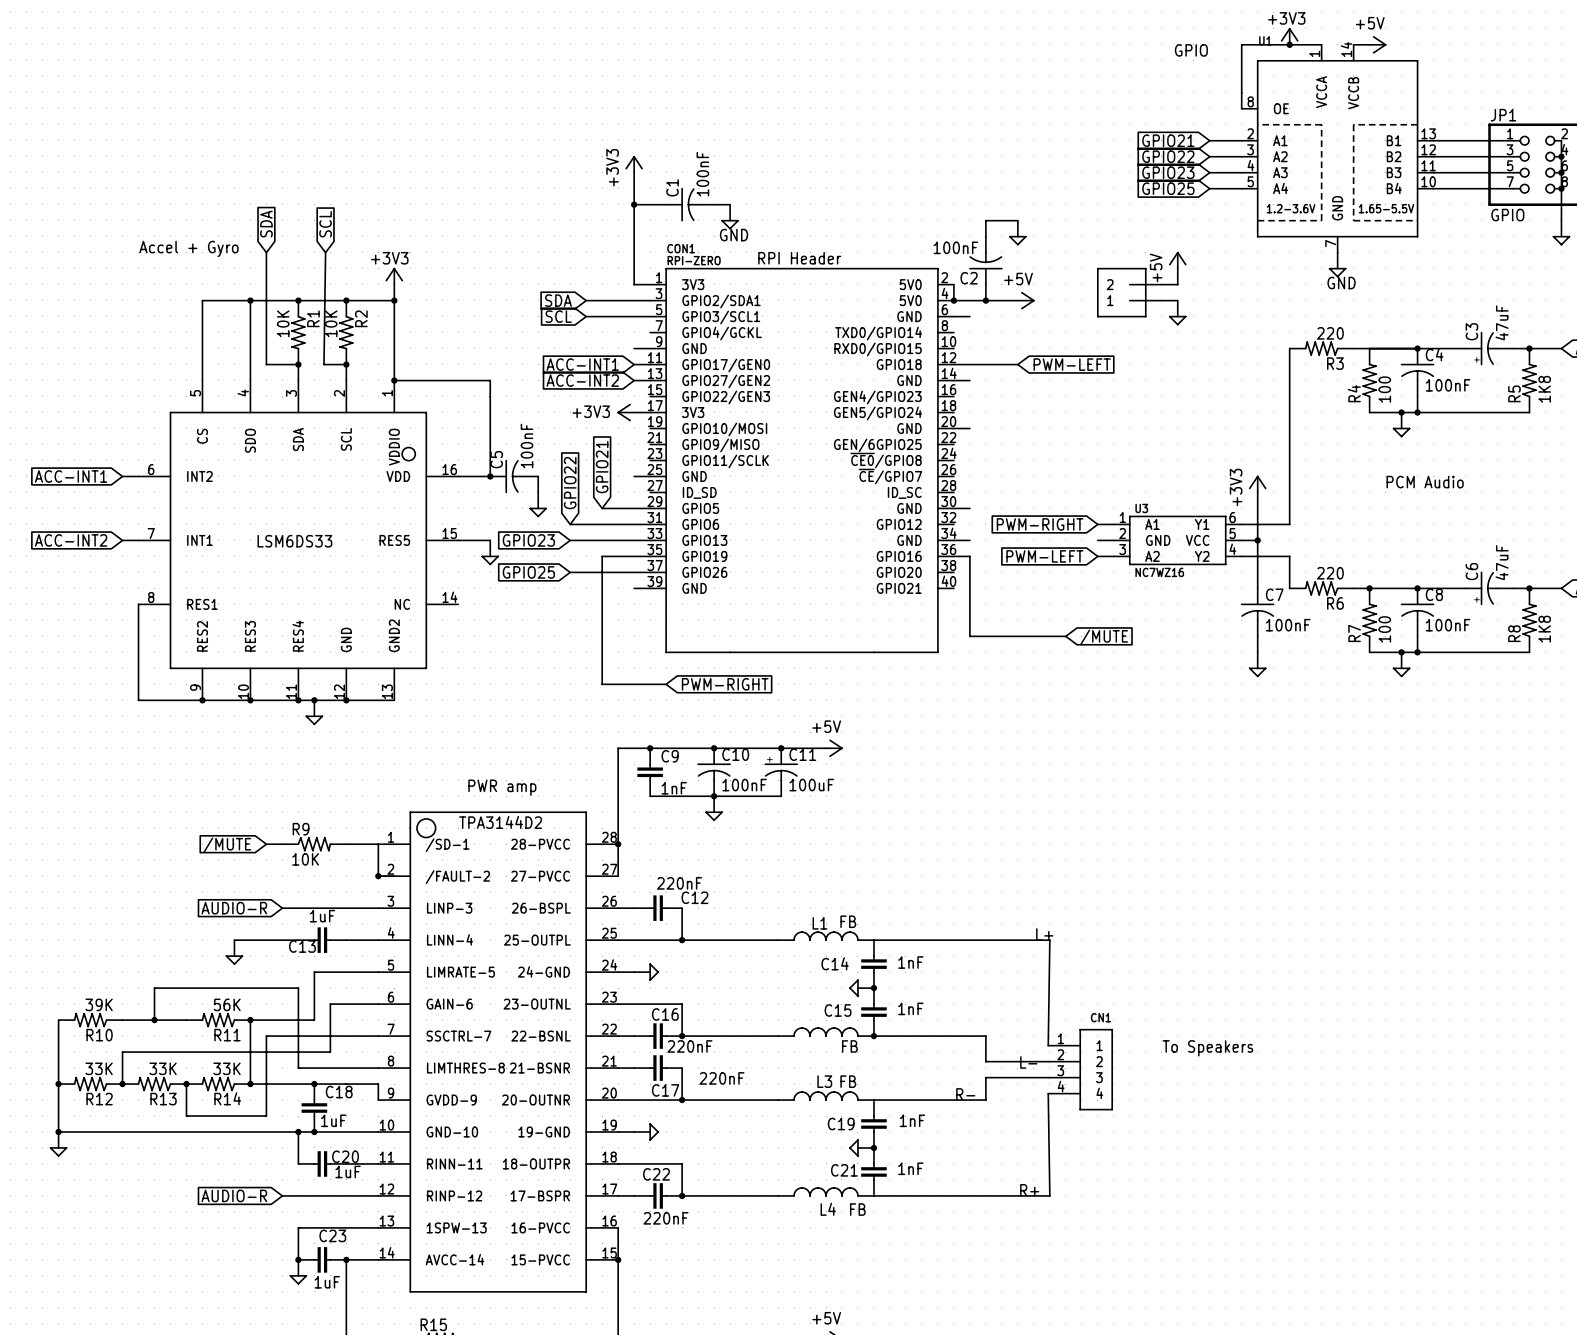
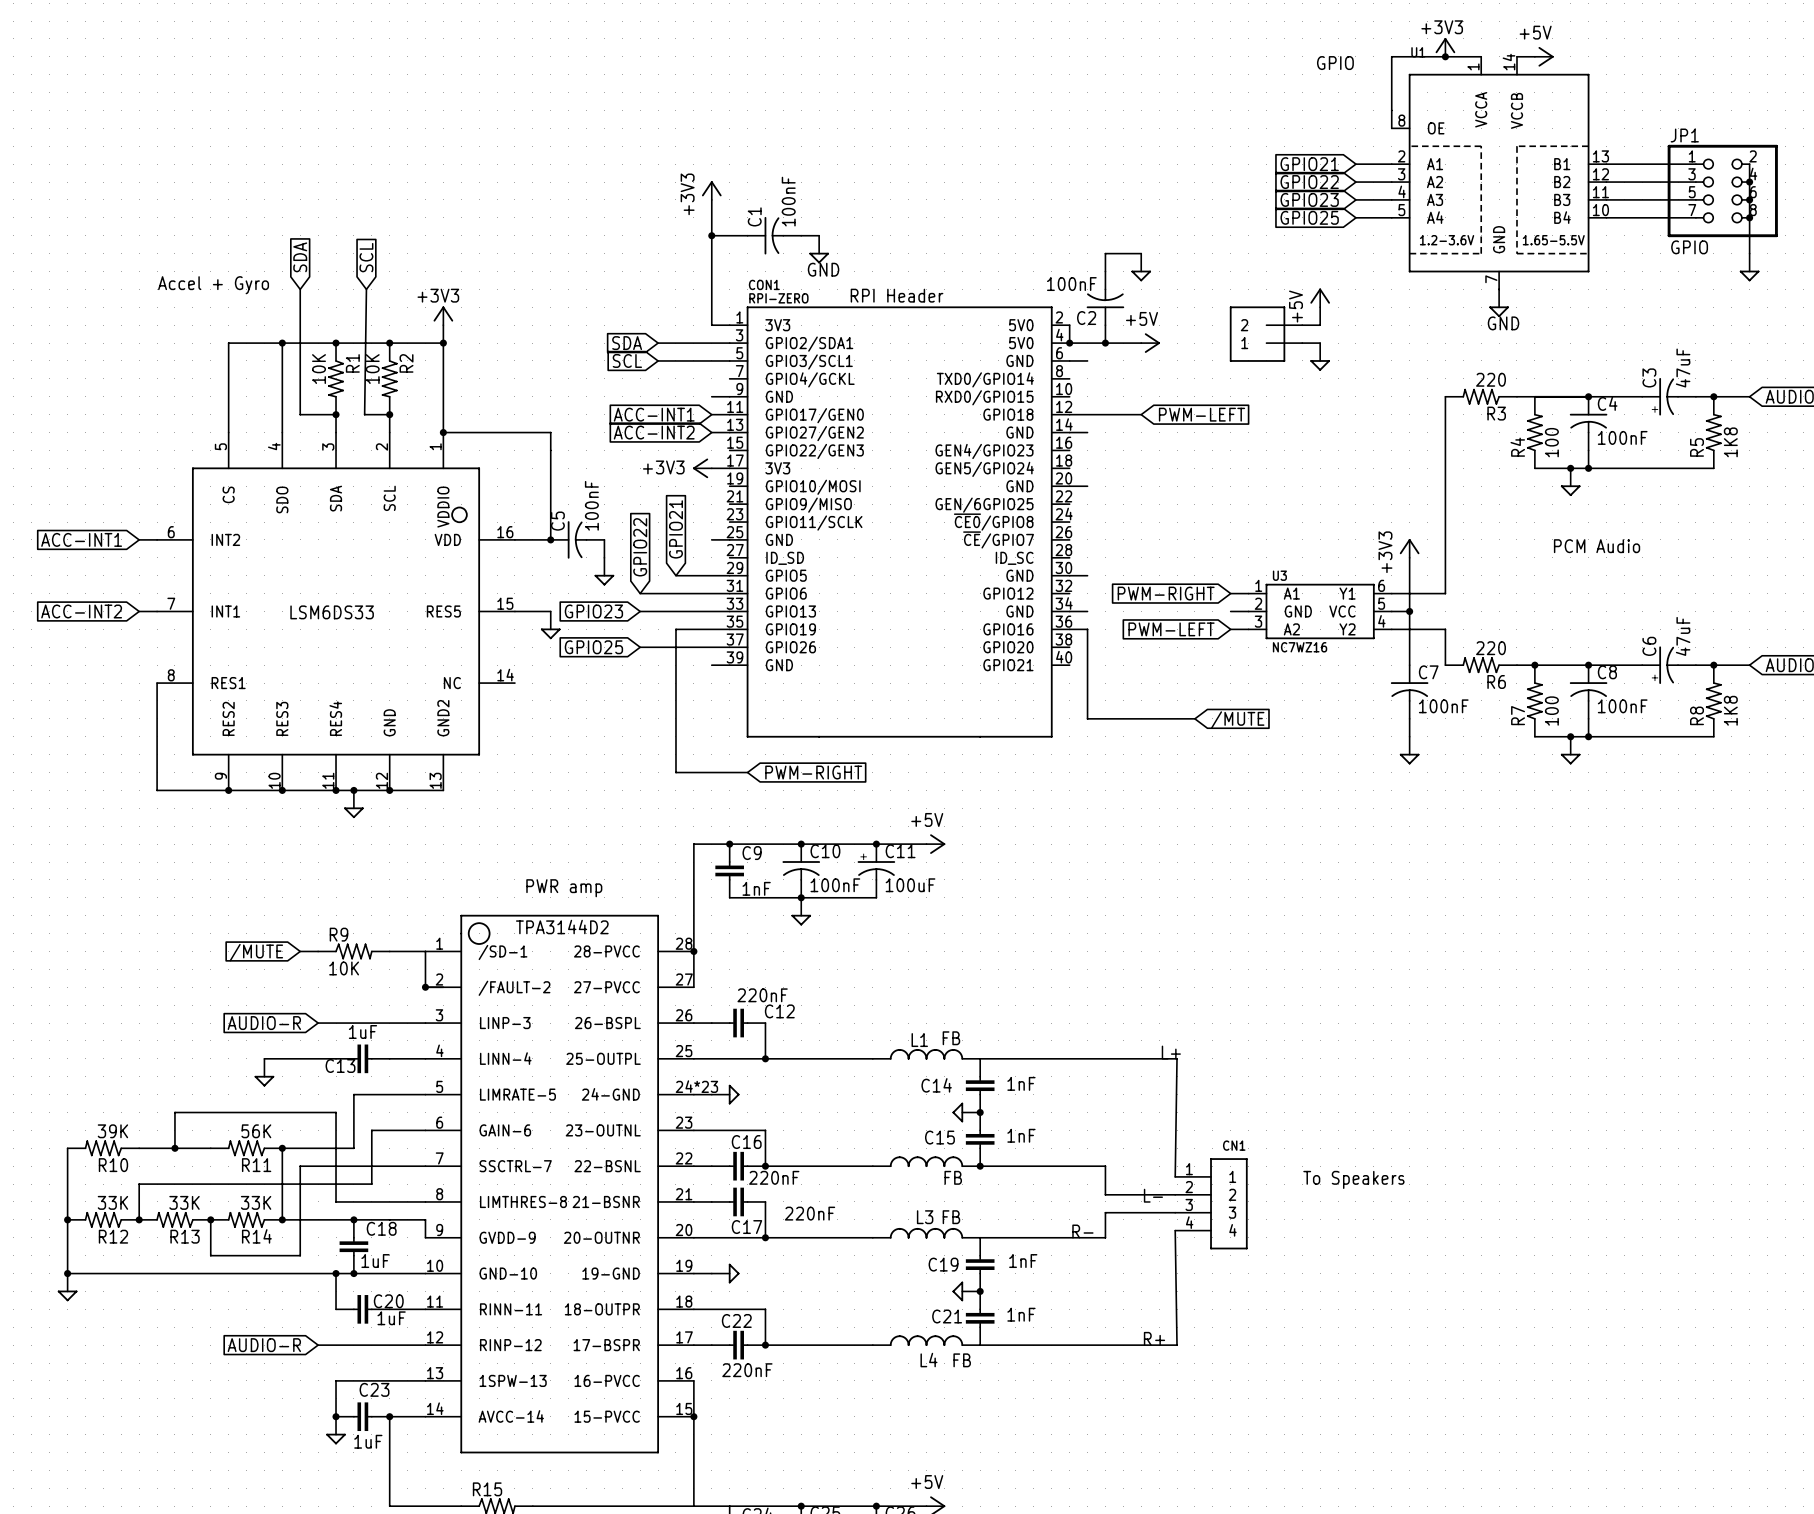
part pin number: 24 (609, 964) -> 24*23 (696, 1086)

